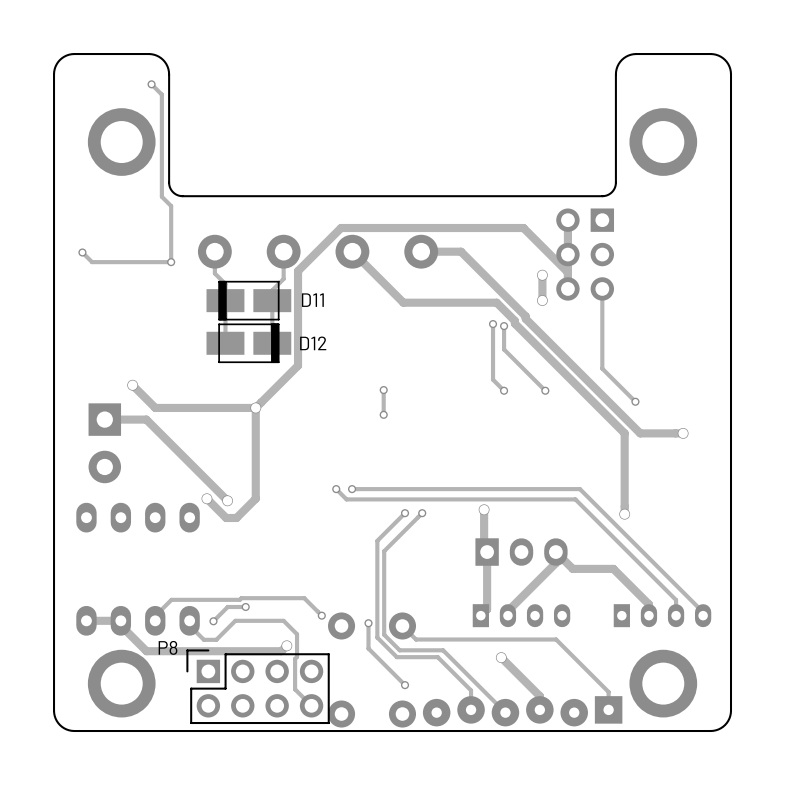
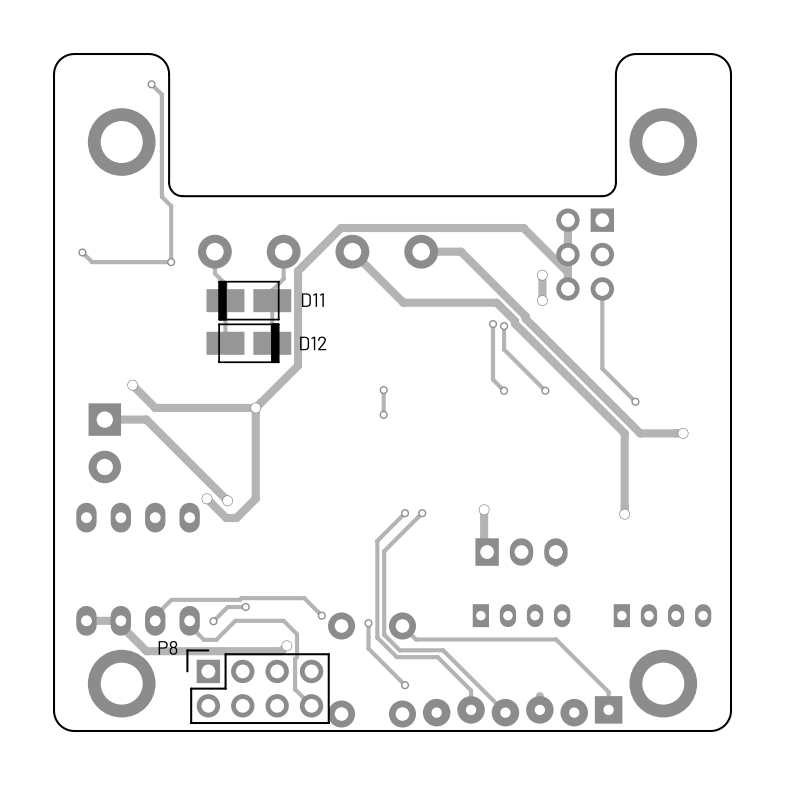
track: (336, 489) (346, 499) (575, 499) (676, 600) (676, 615) -> none
via: (336, 489) -> none
track: (352, 489) (579, 489) (703, 612) (703, 615) -> none
via: (352, 489) -> none
track: (487, 552) (487, 609) (480, 615) -> none
track: (555, 552) (572, 568) (613, 568) (648, 604) (648, 615) -> none
track: (555, 563) (507, 611) (507, 615) -> none
track: (501, 657) (539, 696) -> none
via: (501, 657) -> none

